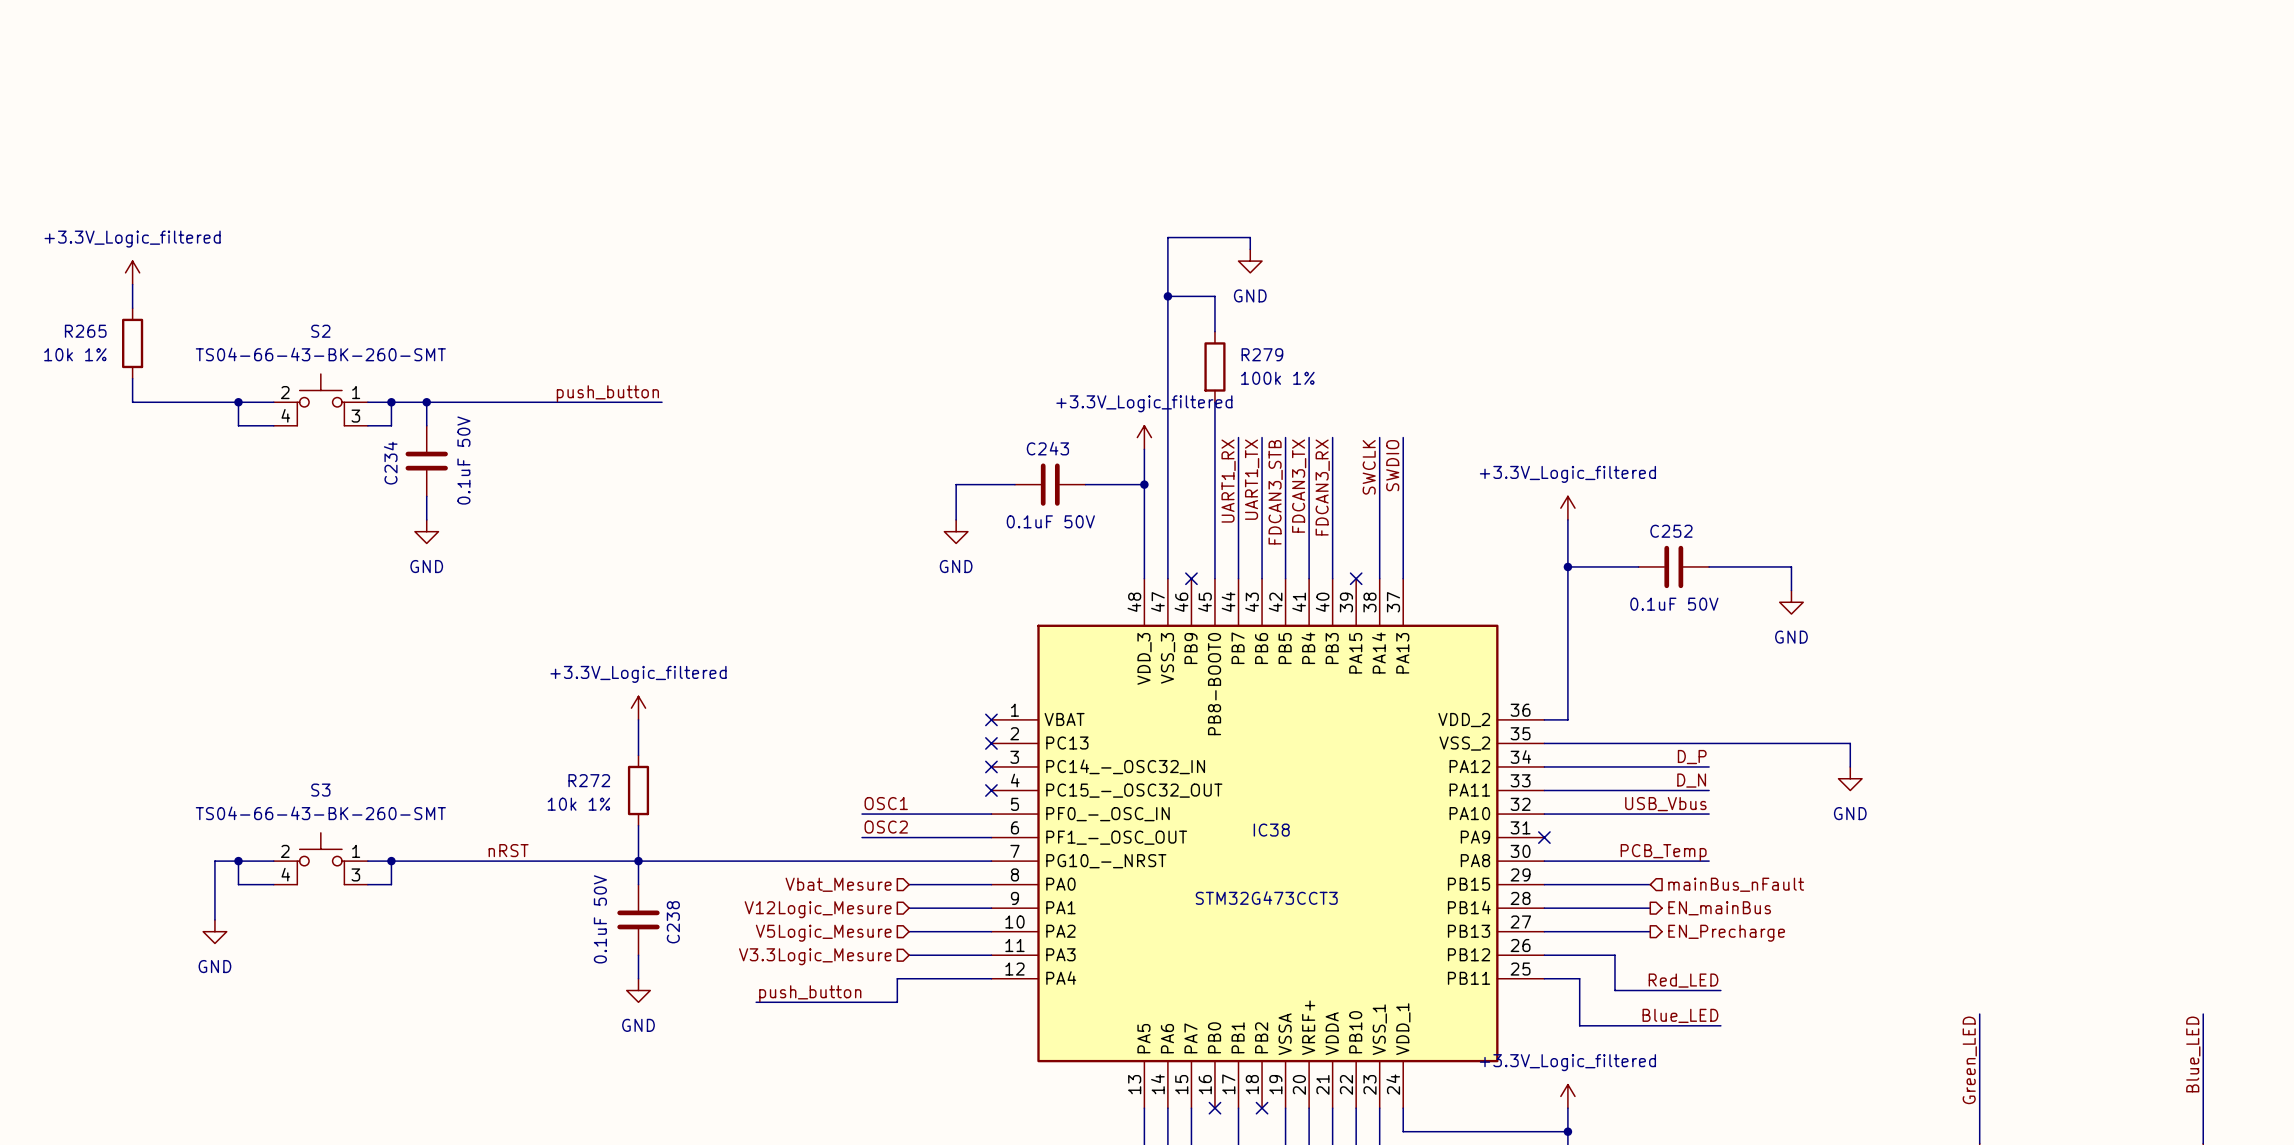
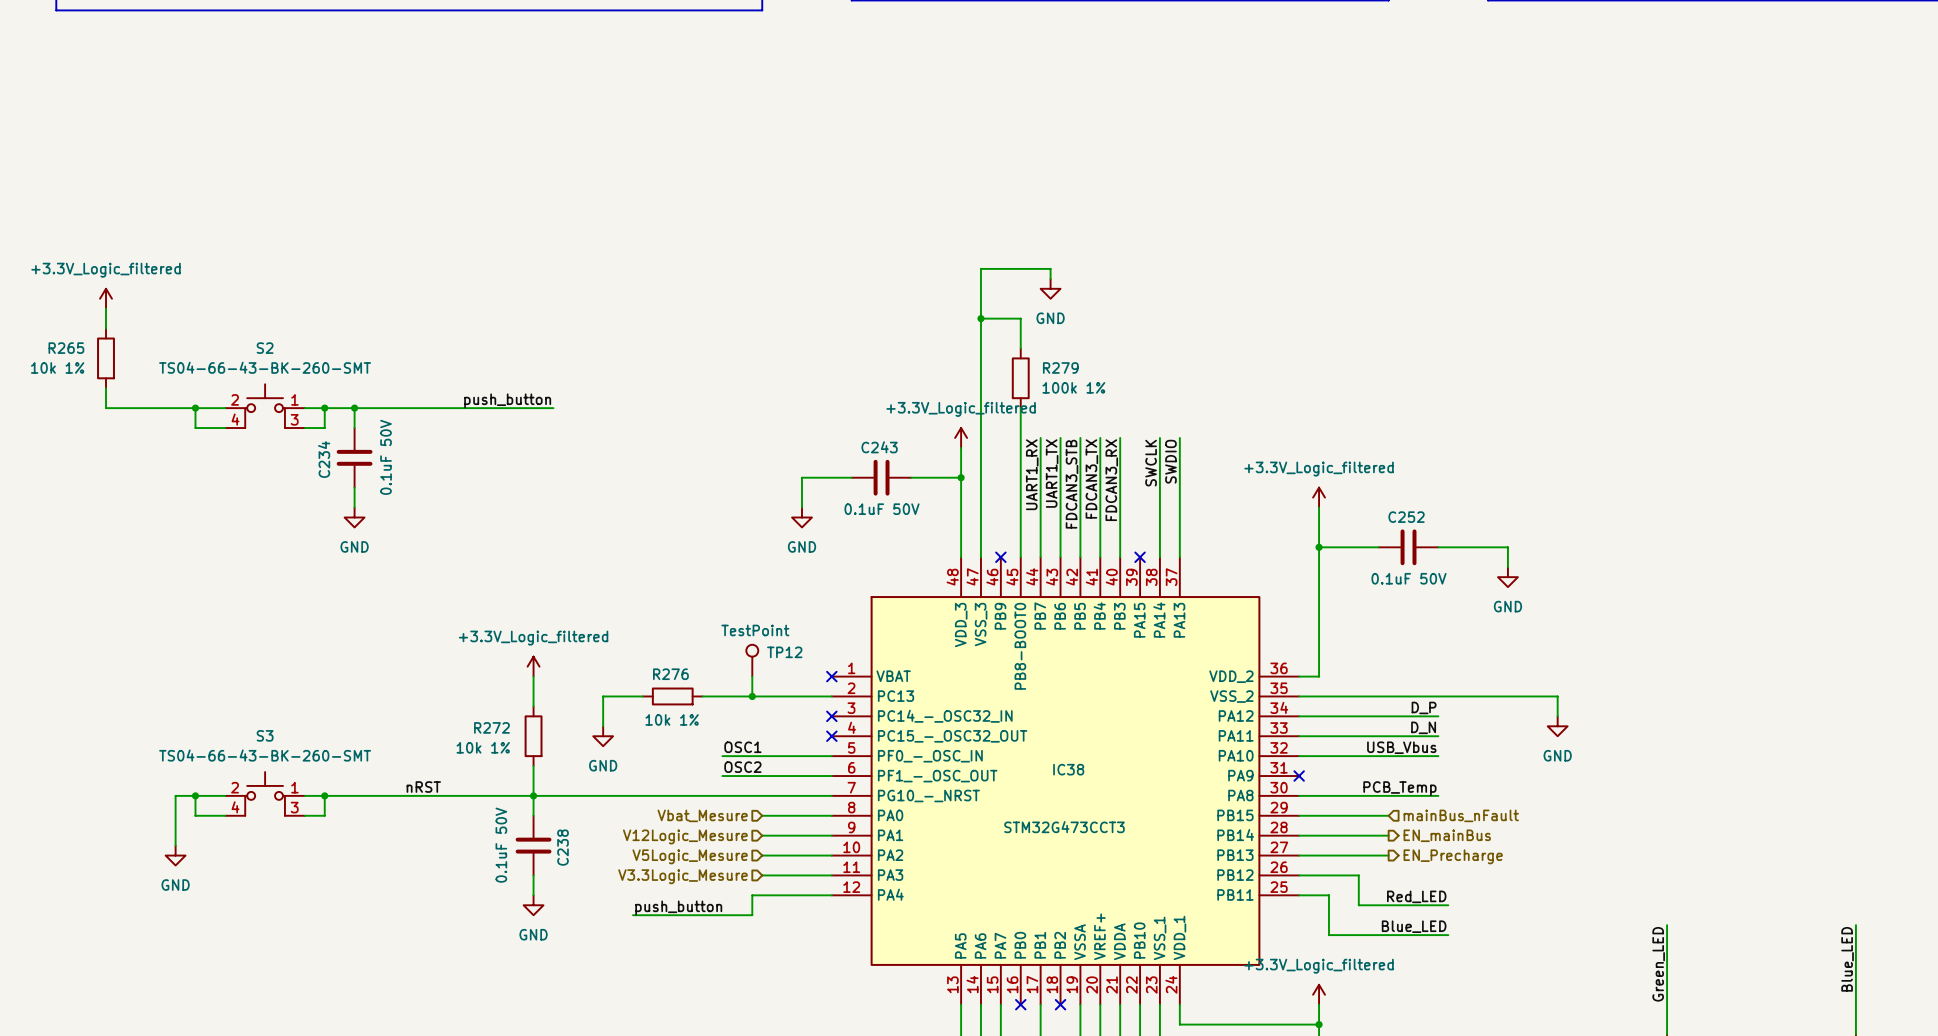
TP12: none -> TestPoint (752, 660)
wire: none -> (752, 676) (752, 696)
wire: none -> (642, 696) (603, 696) (603, 726)
R276: none -> 10k 1% (672, 696)
wire: none -> (702, 696) (831, 696)
junction: none -> (752, 696)
no-connect mark: (991, 743) -> none
power symbol: none -> GND (603, 736)

